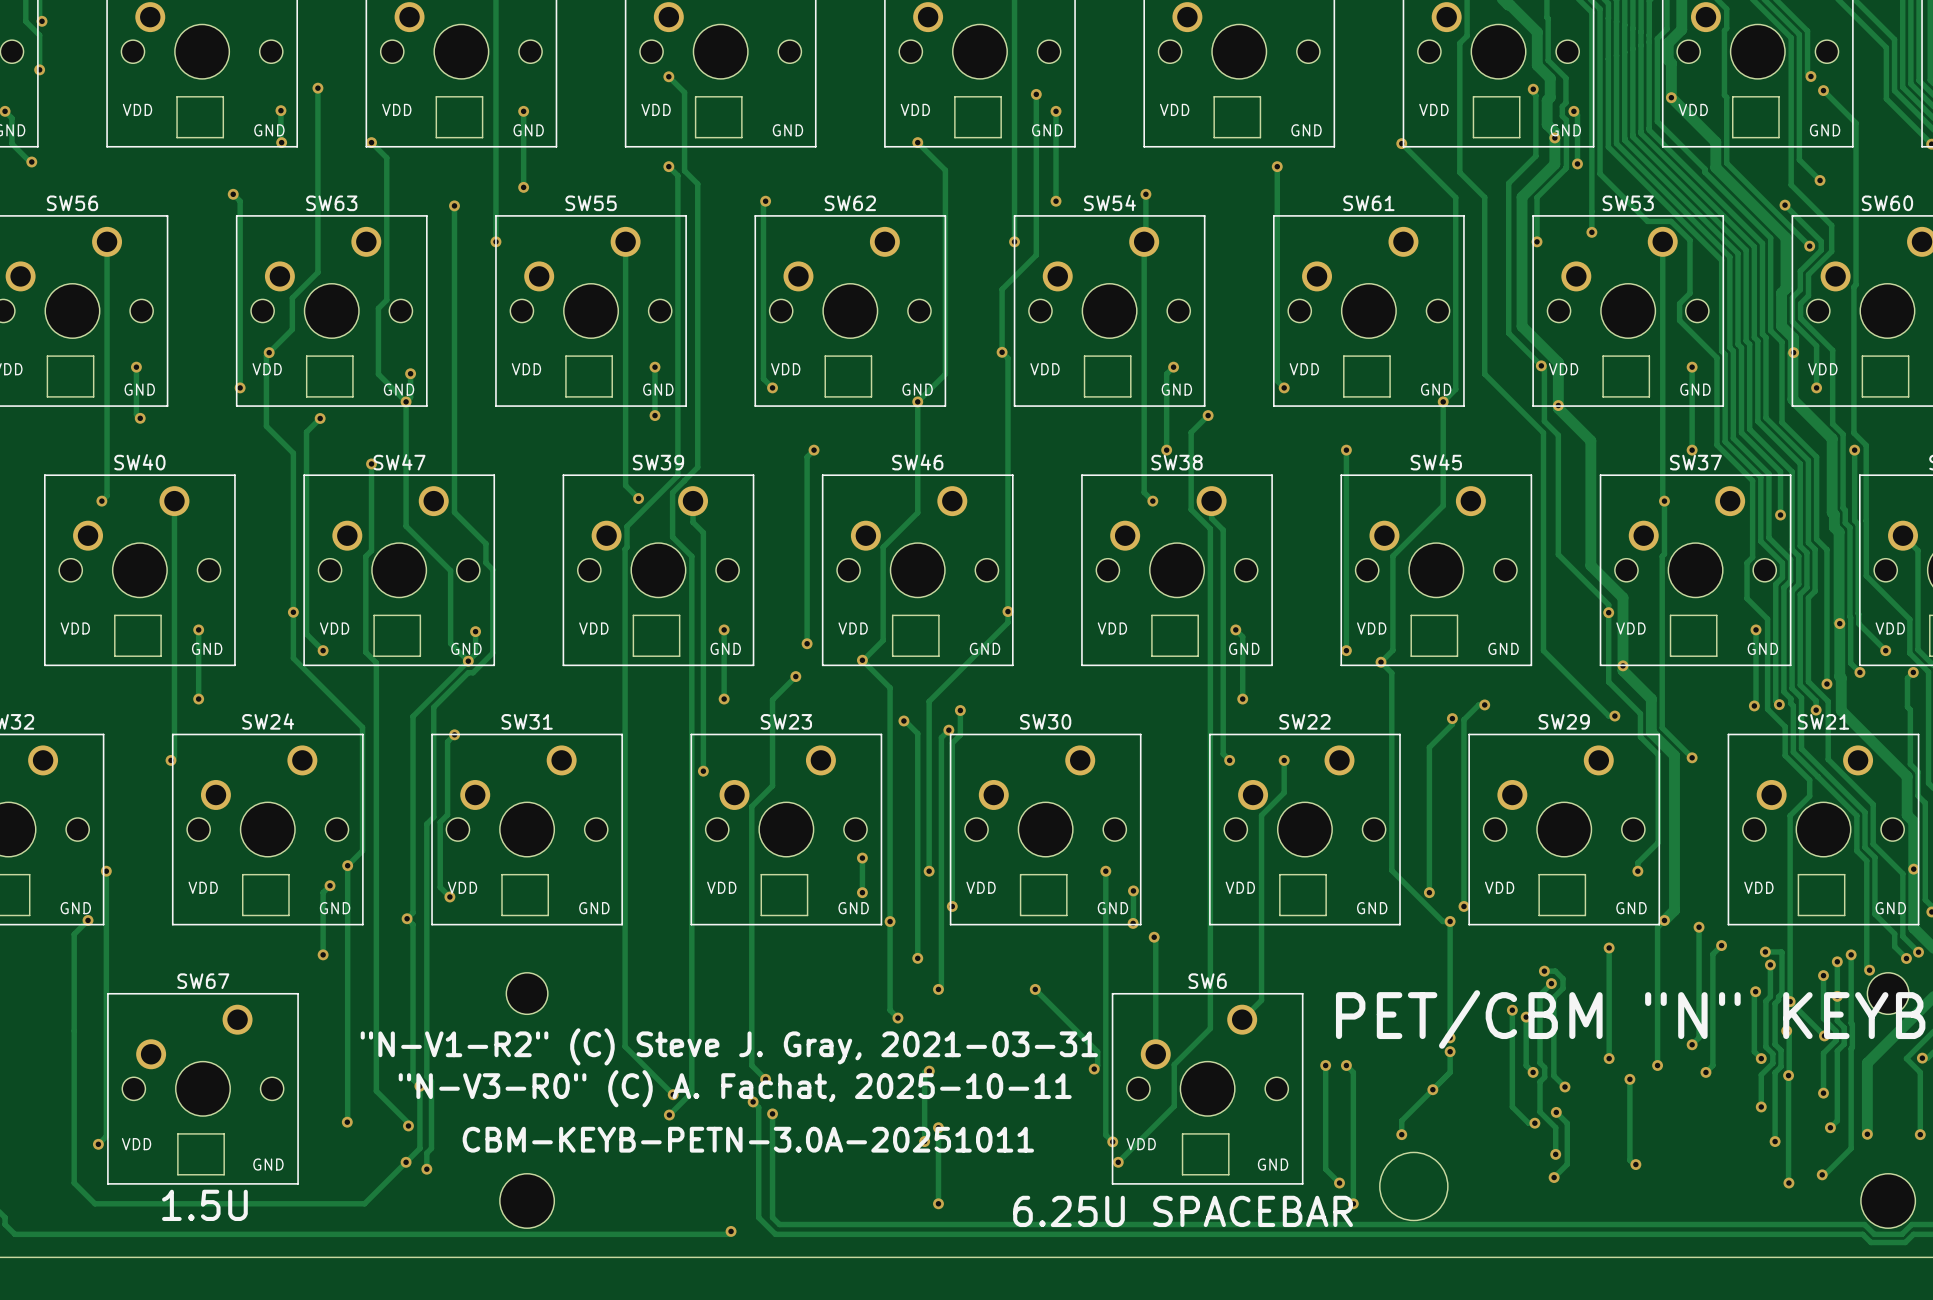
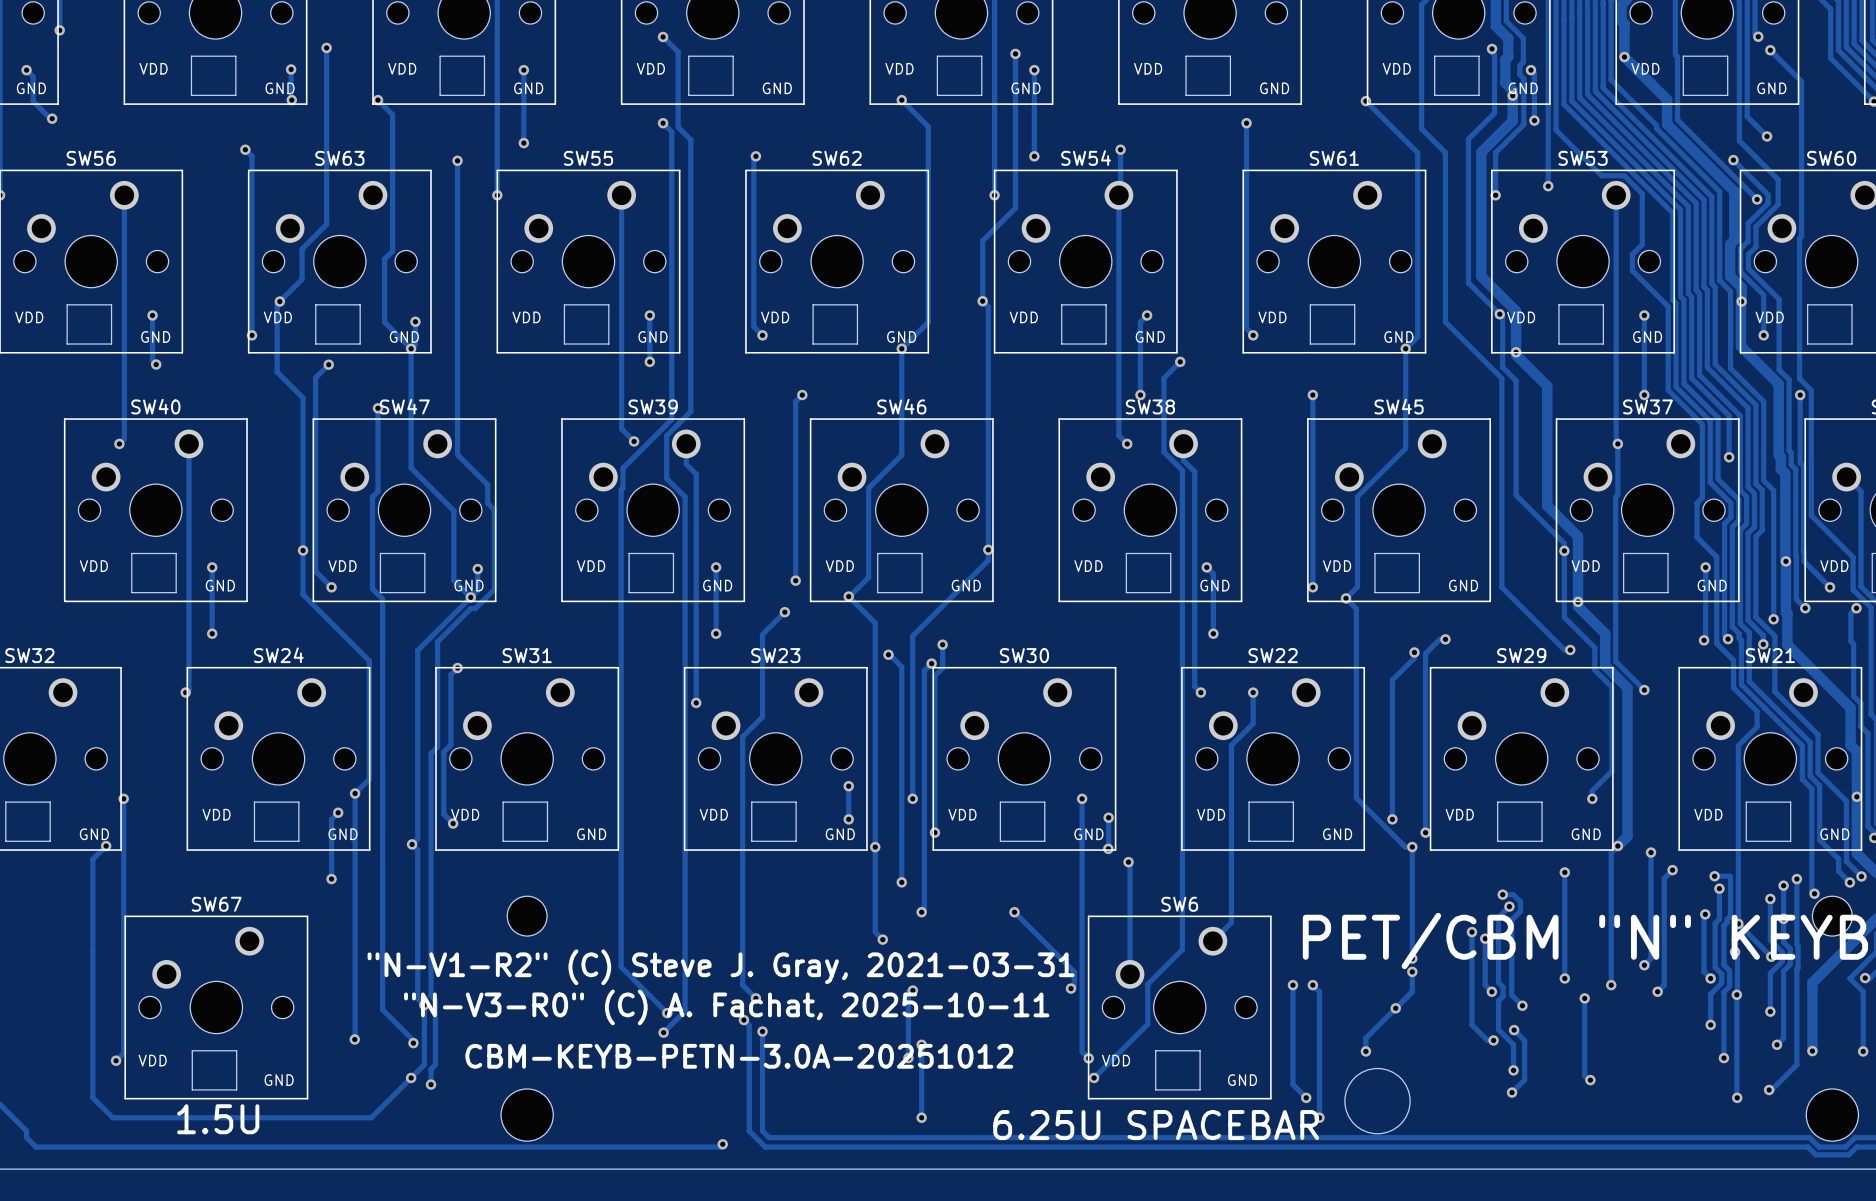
text: CBM-KEYB-PETN-3.0A-20251011 (748, 1139) -> CBM-KEYB-PETN-3.0A-20251012 (739, 1056)

